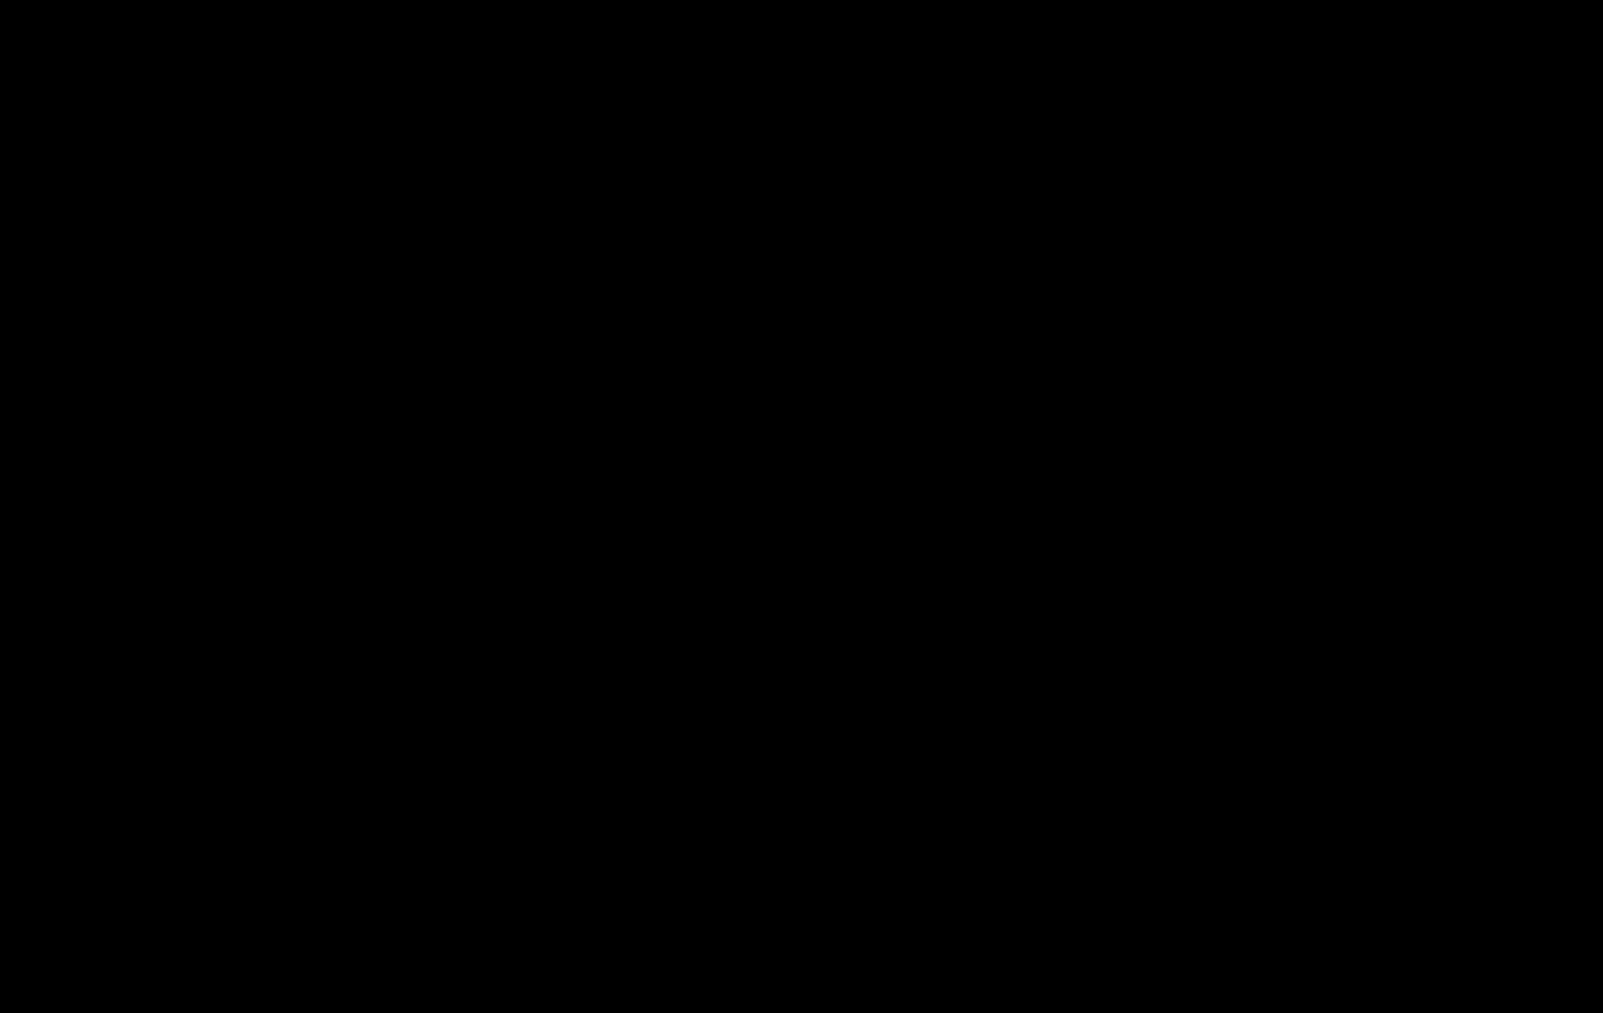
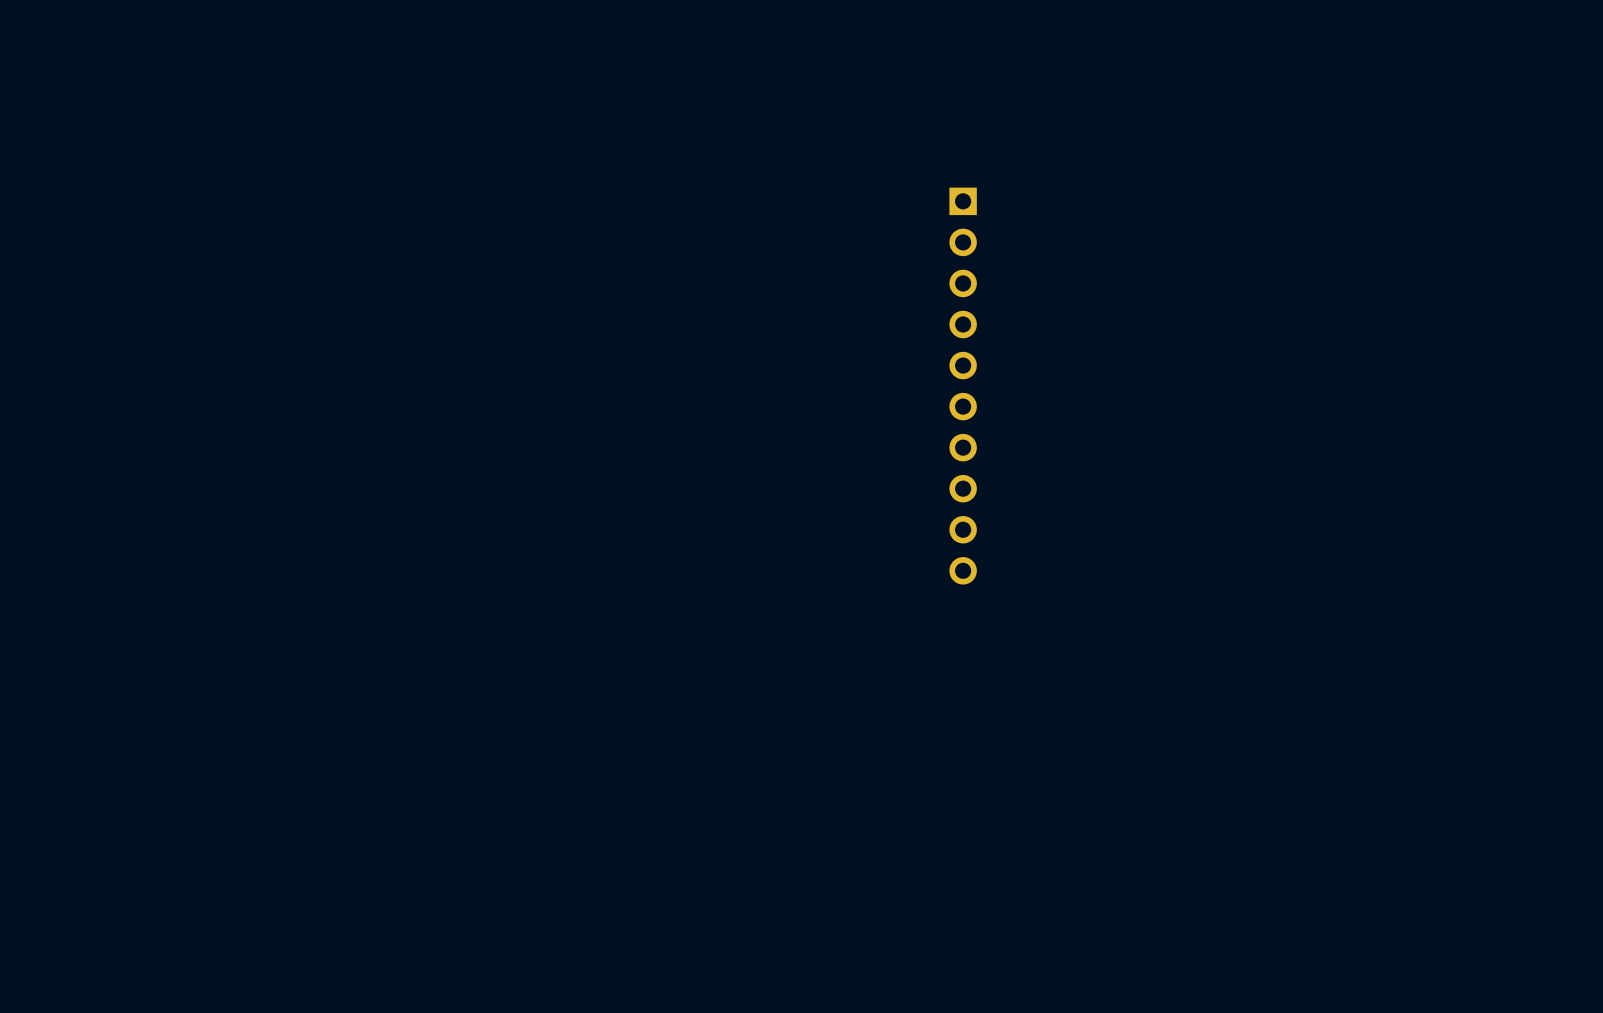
part: none -> (963, 386)

